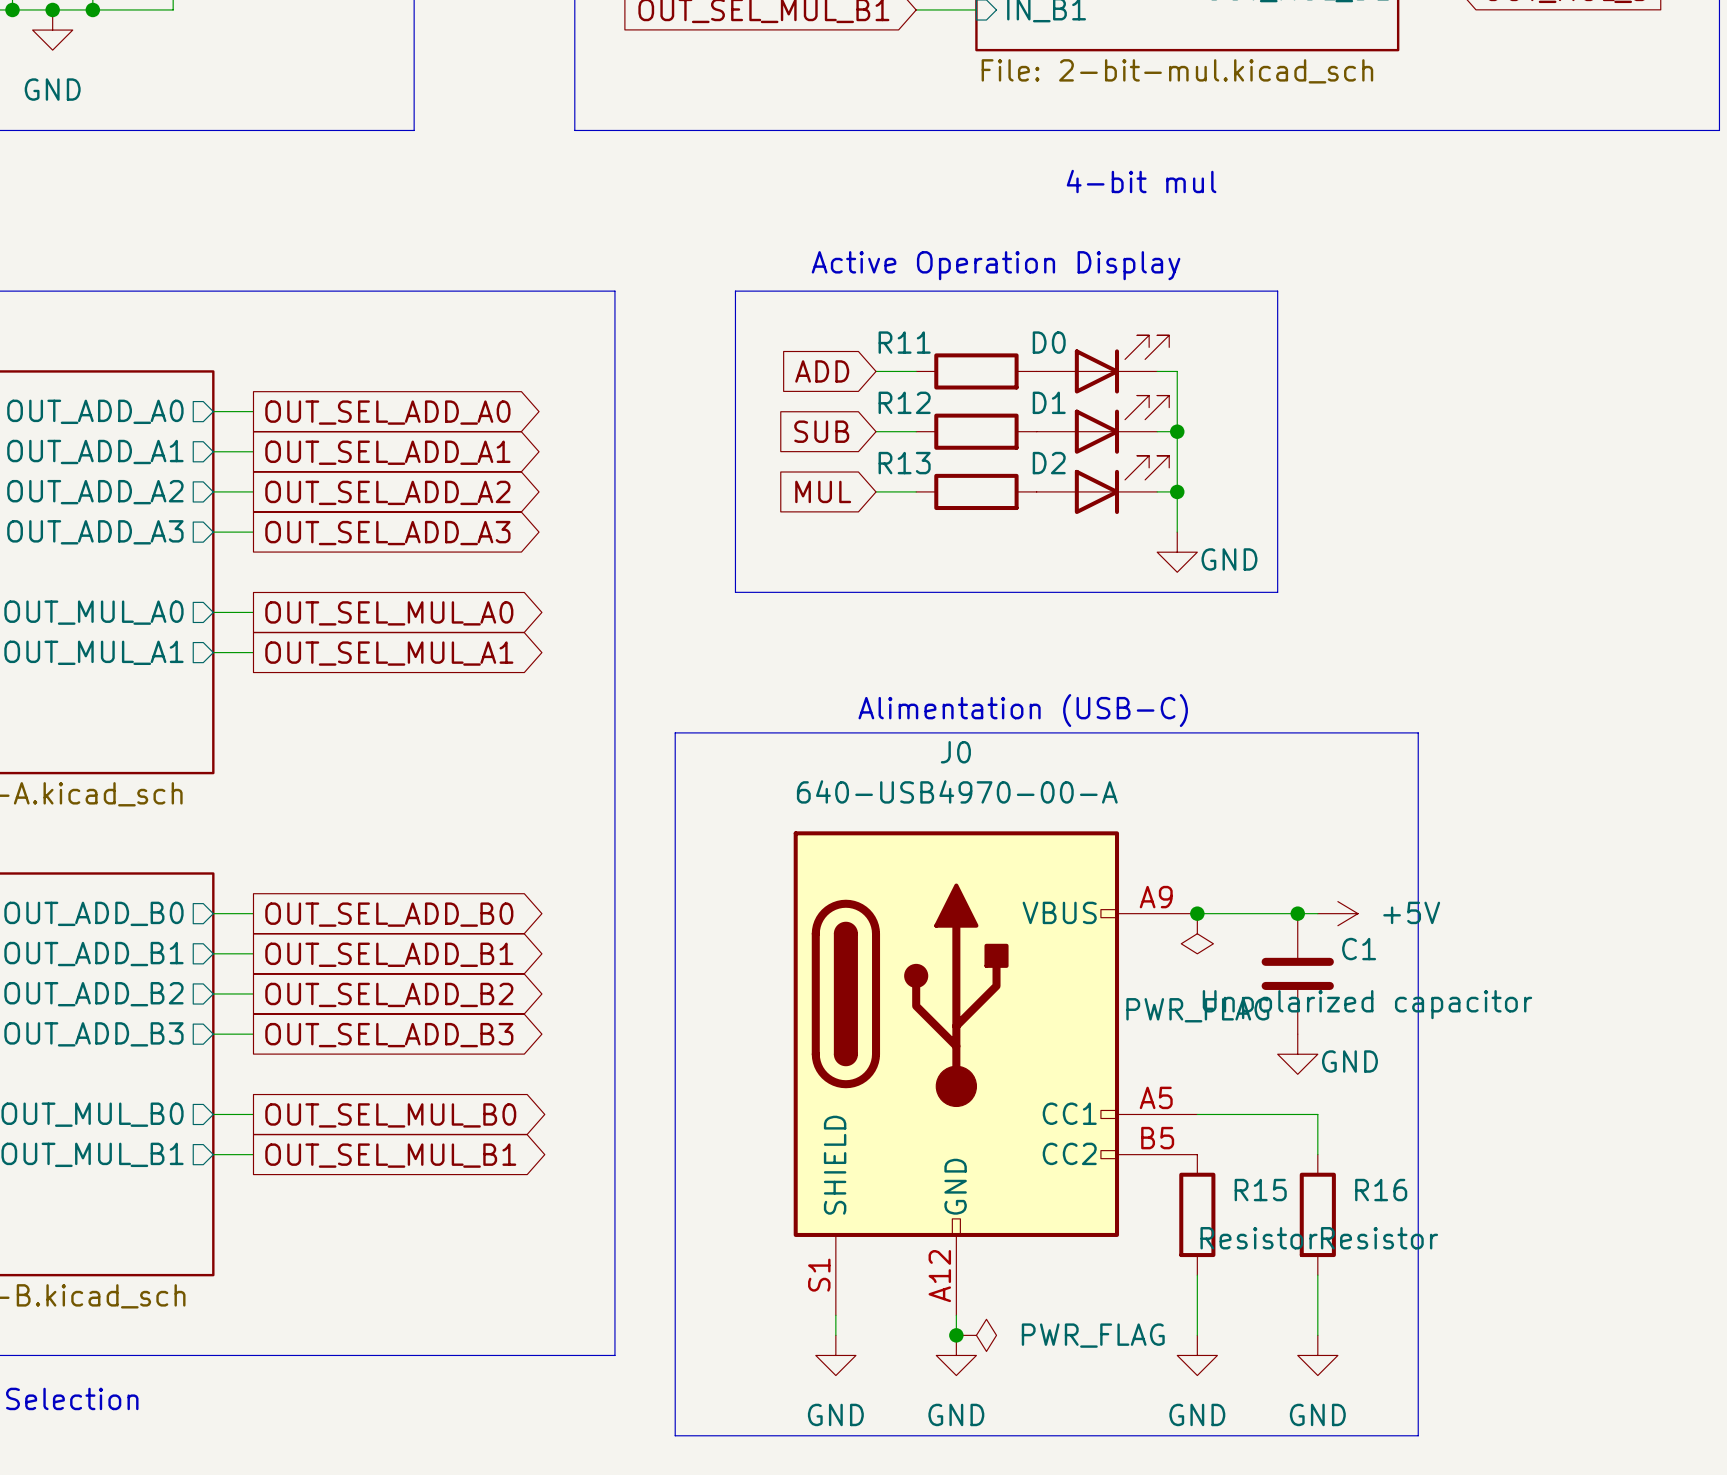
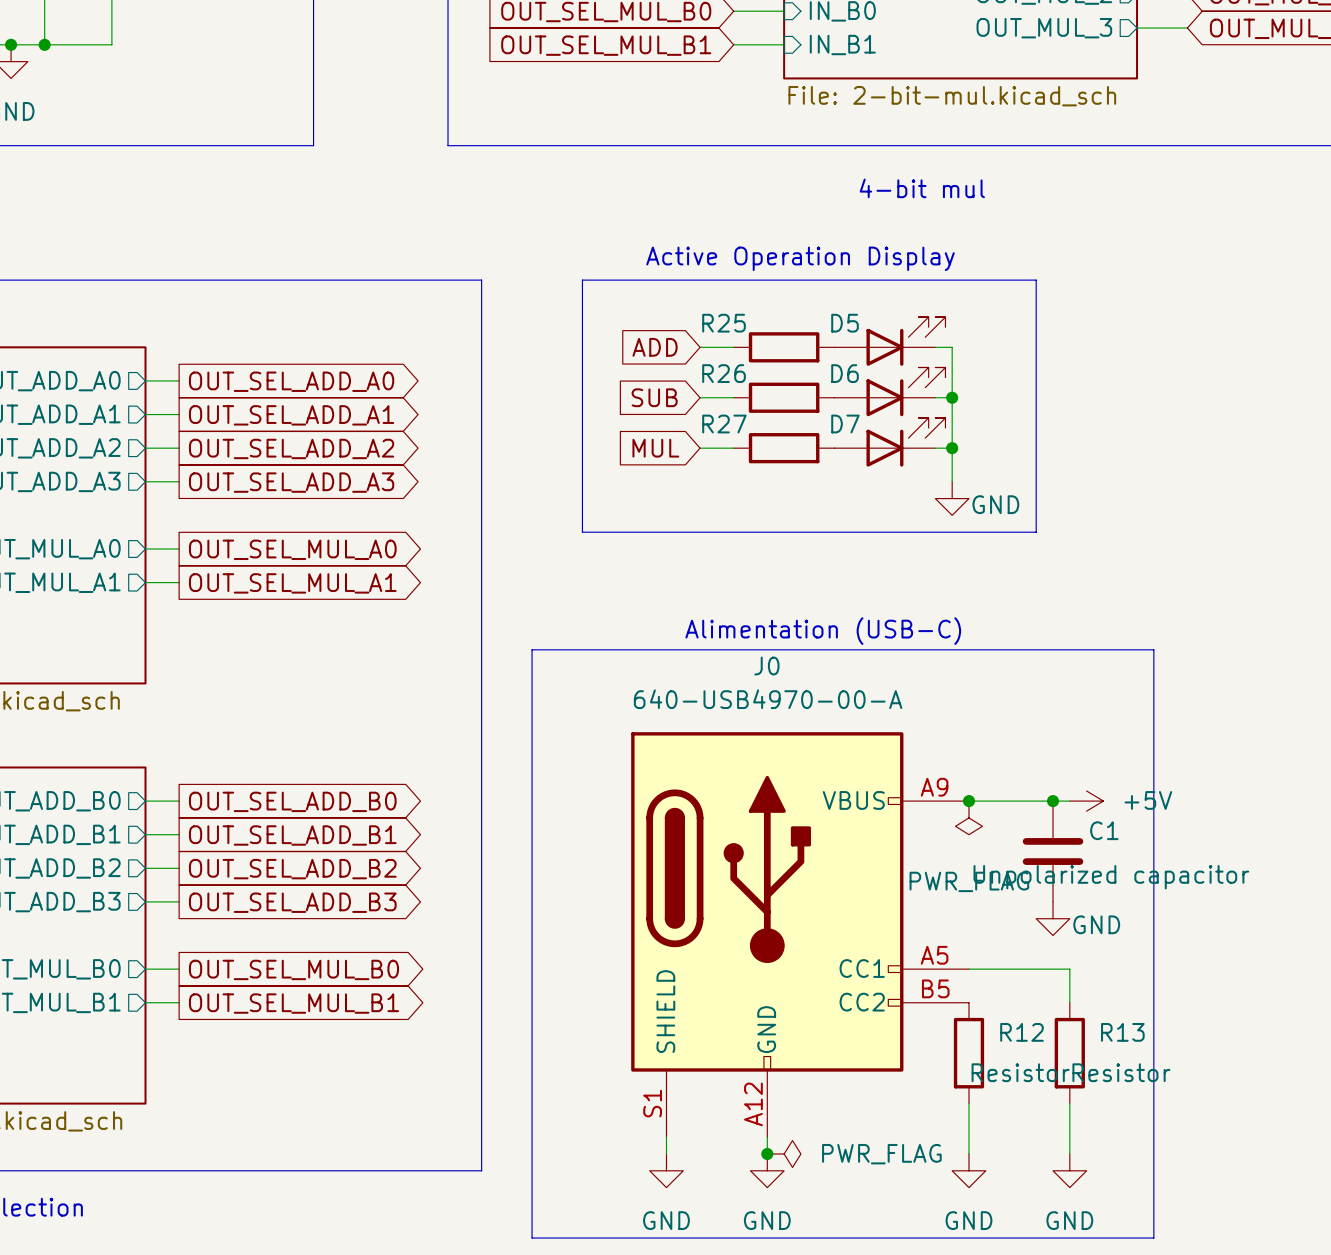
R11 name: R11 (904, 342) -> R25 (724, 323)
D0 name: D0 (1049, 342) -> D5 (845, 323)
R12 name: R12 (904, 402) -> R26 (724, 373)
D1 name: D1 (1049, 402) -> D6 (845, 373)
R13 name: R13 (904, 463) -> R27 (724, 424)
D2 name: D2 (1049, 463) -> D7 (845, 424)
R15 name: R15 (1260, 1190) -> R12 (1022, 1032)
R16 name: R16 (1381, 1190) -> R13 (1122, 1032)

